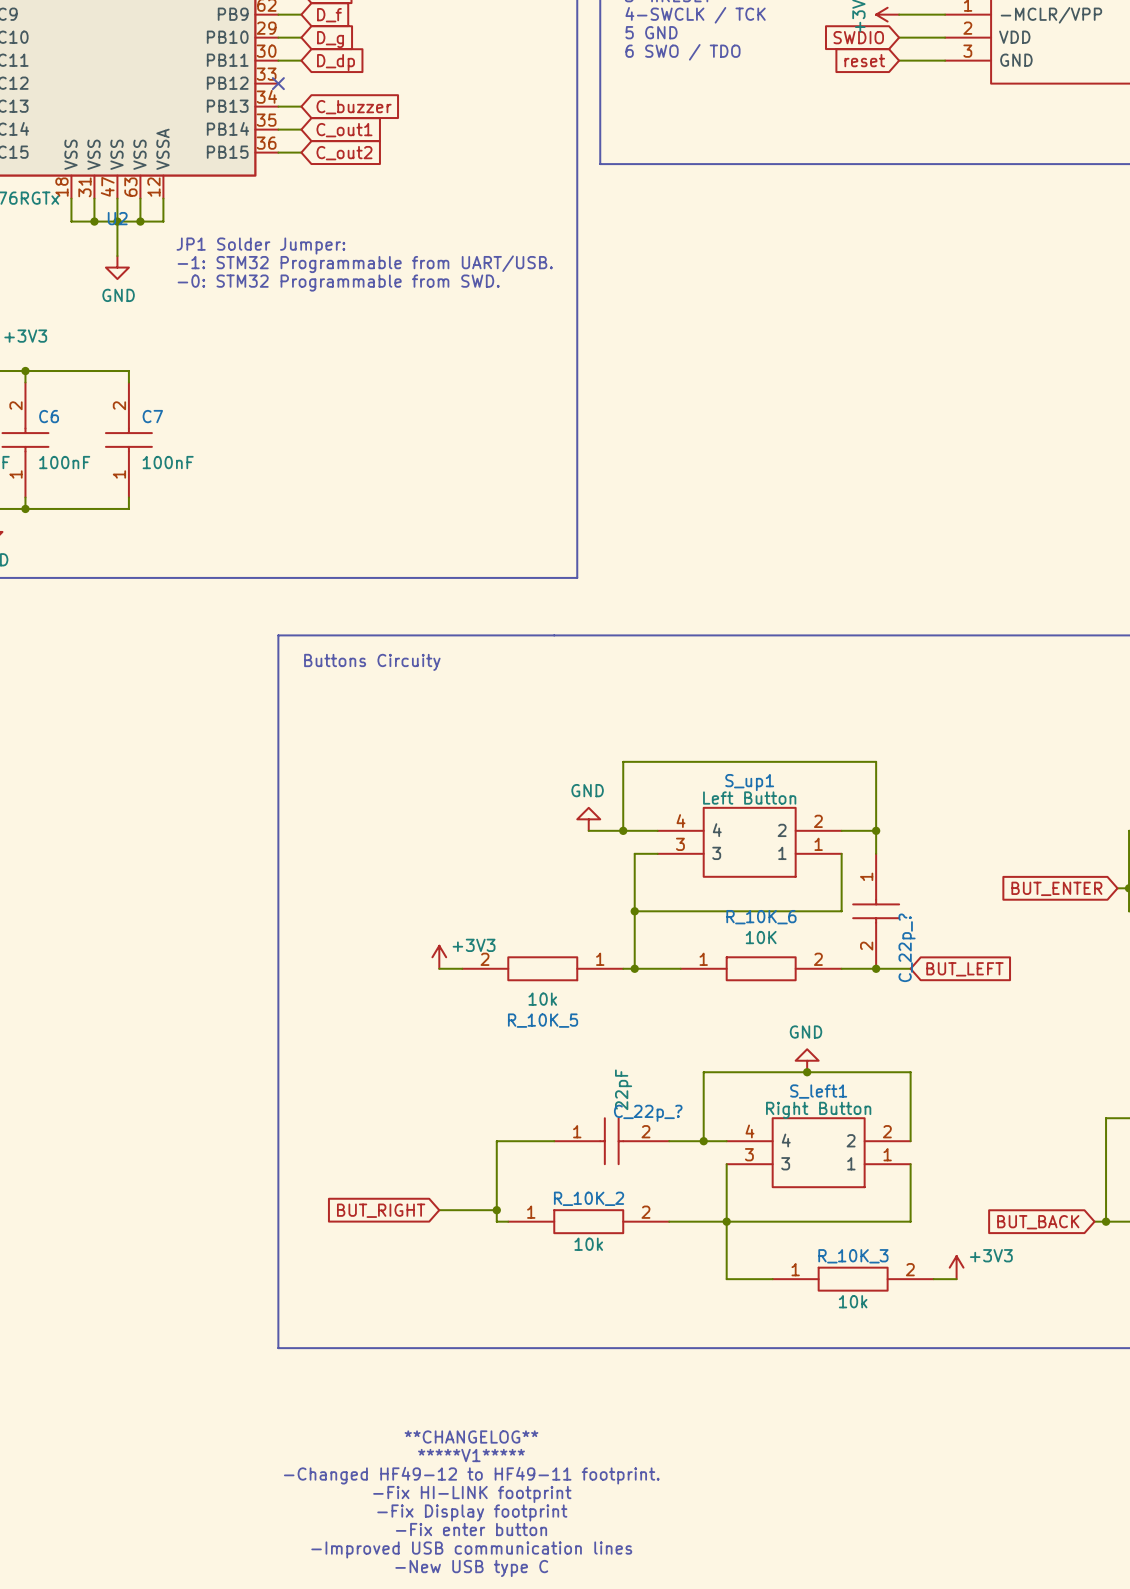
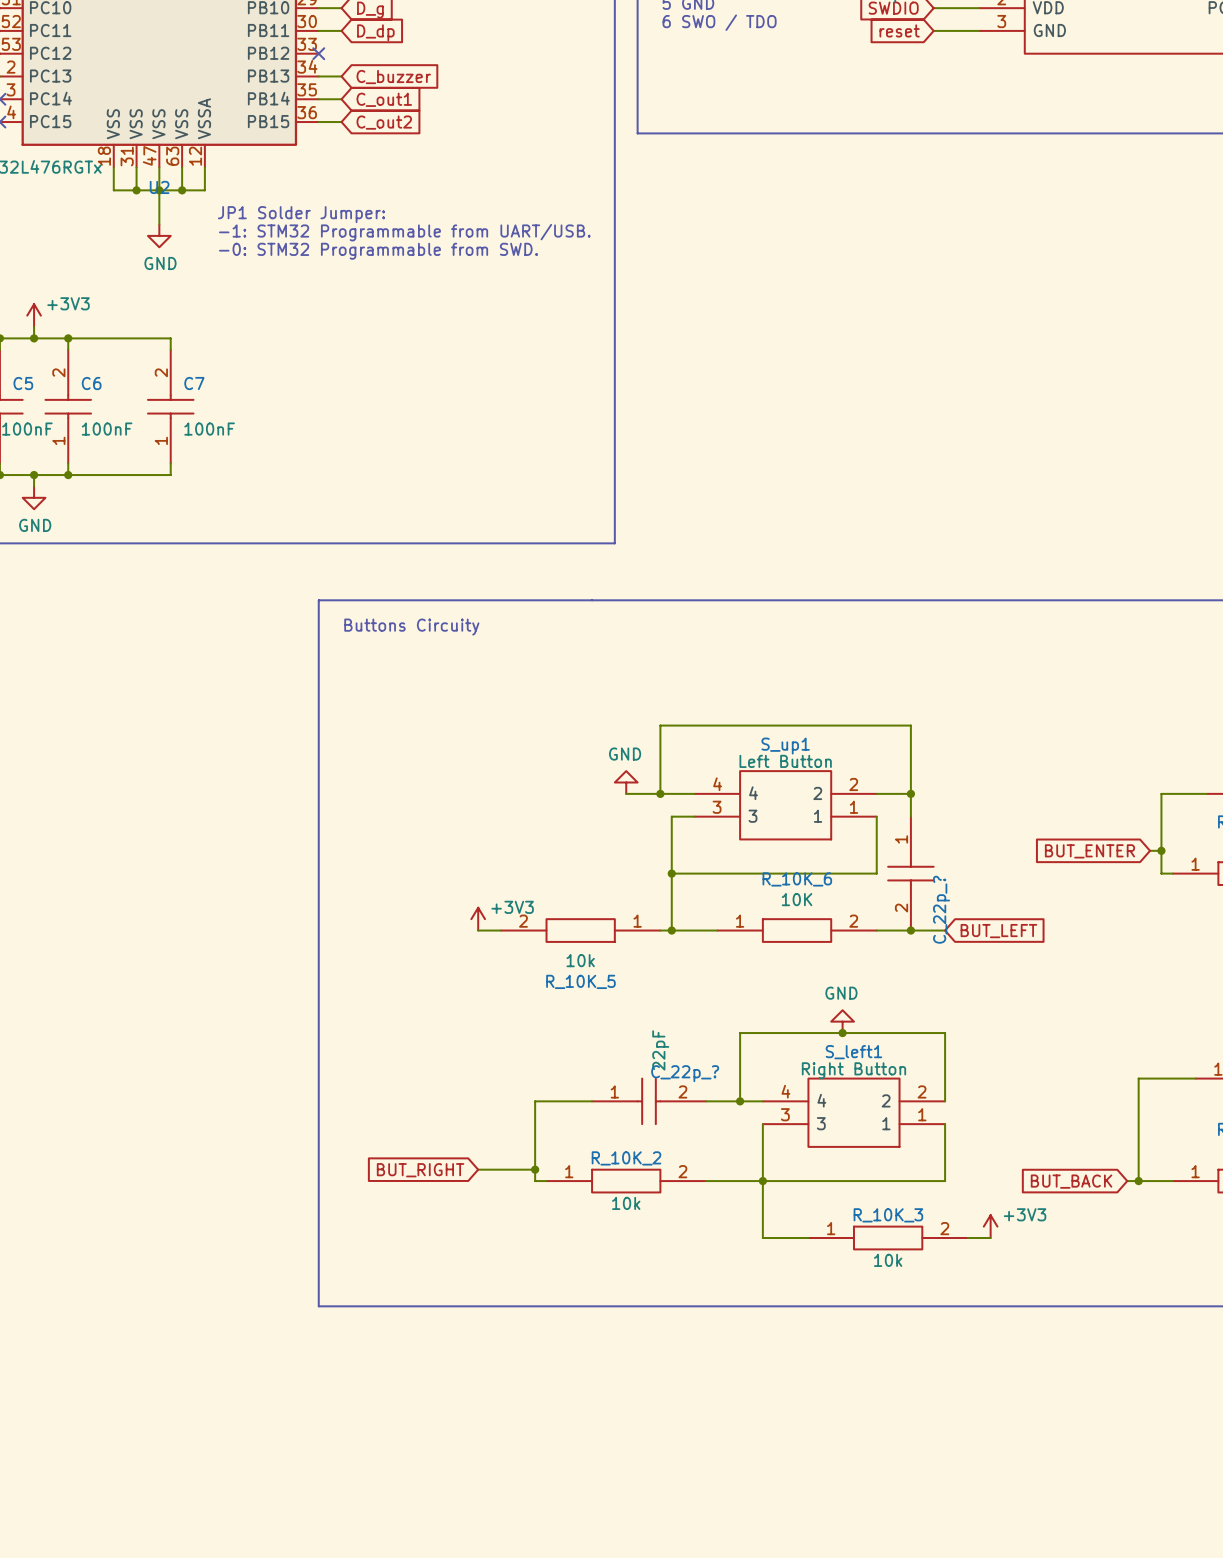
text: **CHANGELOG** (471, 1437) -> none
text: *****V1***** (471, 1455) -> none
text: -Changed HF49-12 to HF49-11 footprint. (471, 1475) -> none
text: -Fix HI-LINK footprint (472, 1494) -> none
text: -Fix Display footprint (472, 1512) -> none
text: -Fix enter button (471, 1529) -> none
text: -Improved USB communication lines (471, 1549) -> none
text: -New USB type C (471, 1568) -> none

